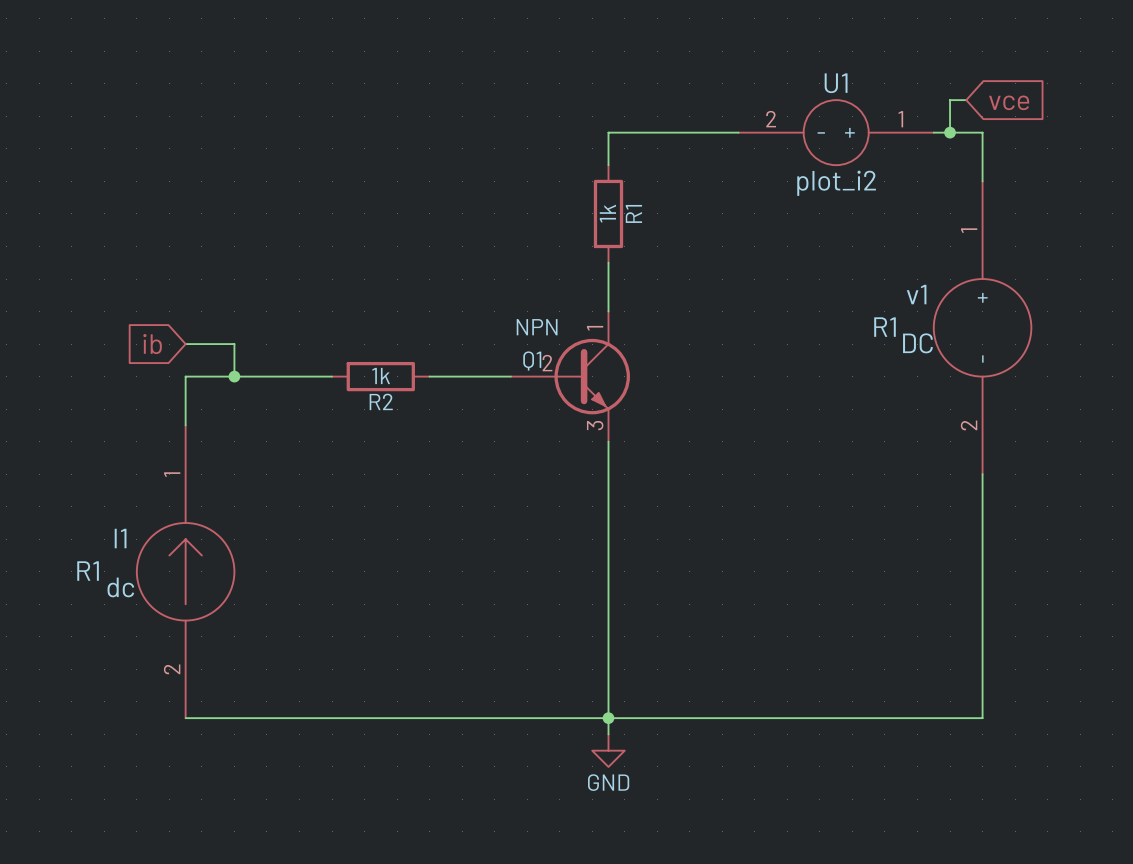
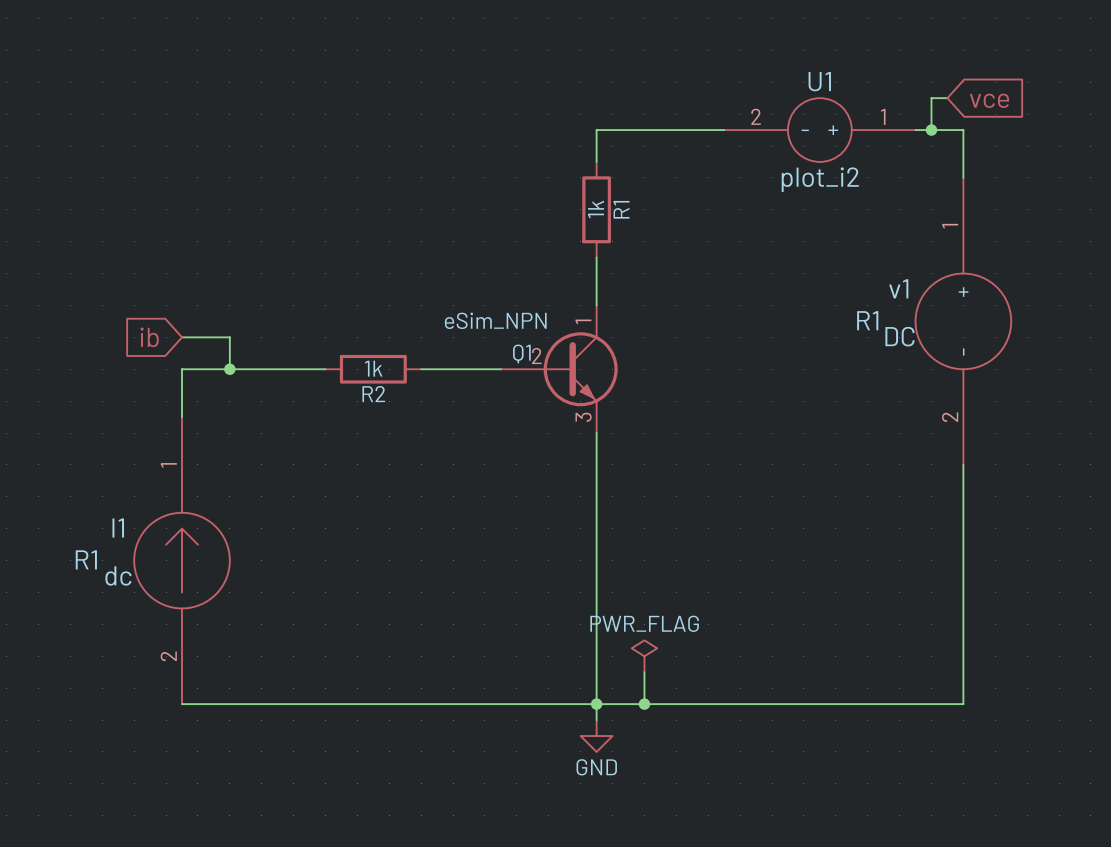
Q1 value: NPN (537, 327) -> eSim_NPN (495, 320)
power symbol: none -> PWR_FLAG (644, 656)
wire: none -> (644, 672) (644, 704)
junction: none -> (644, 704)

